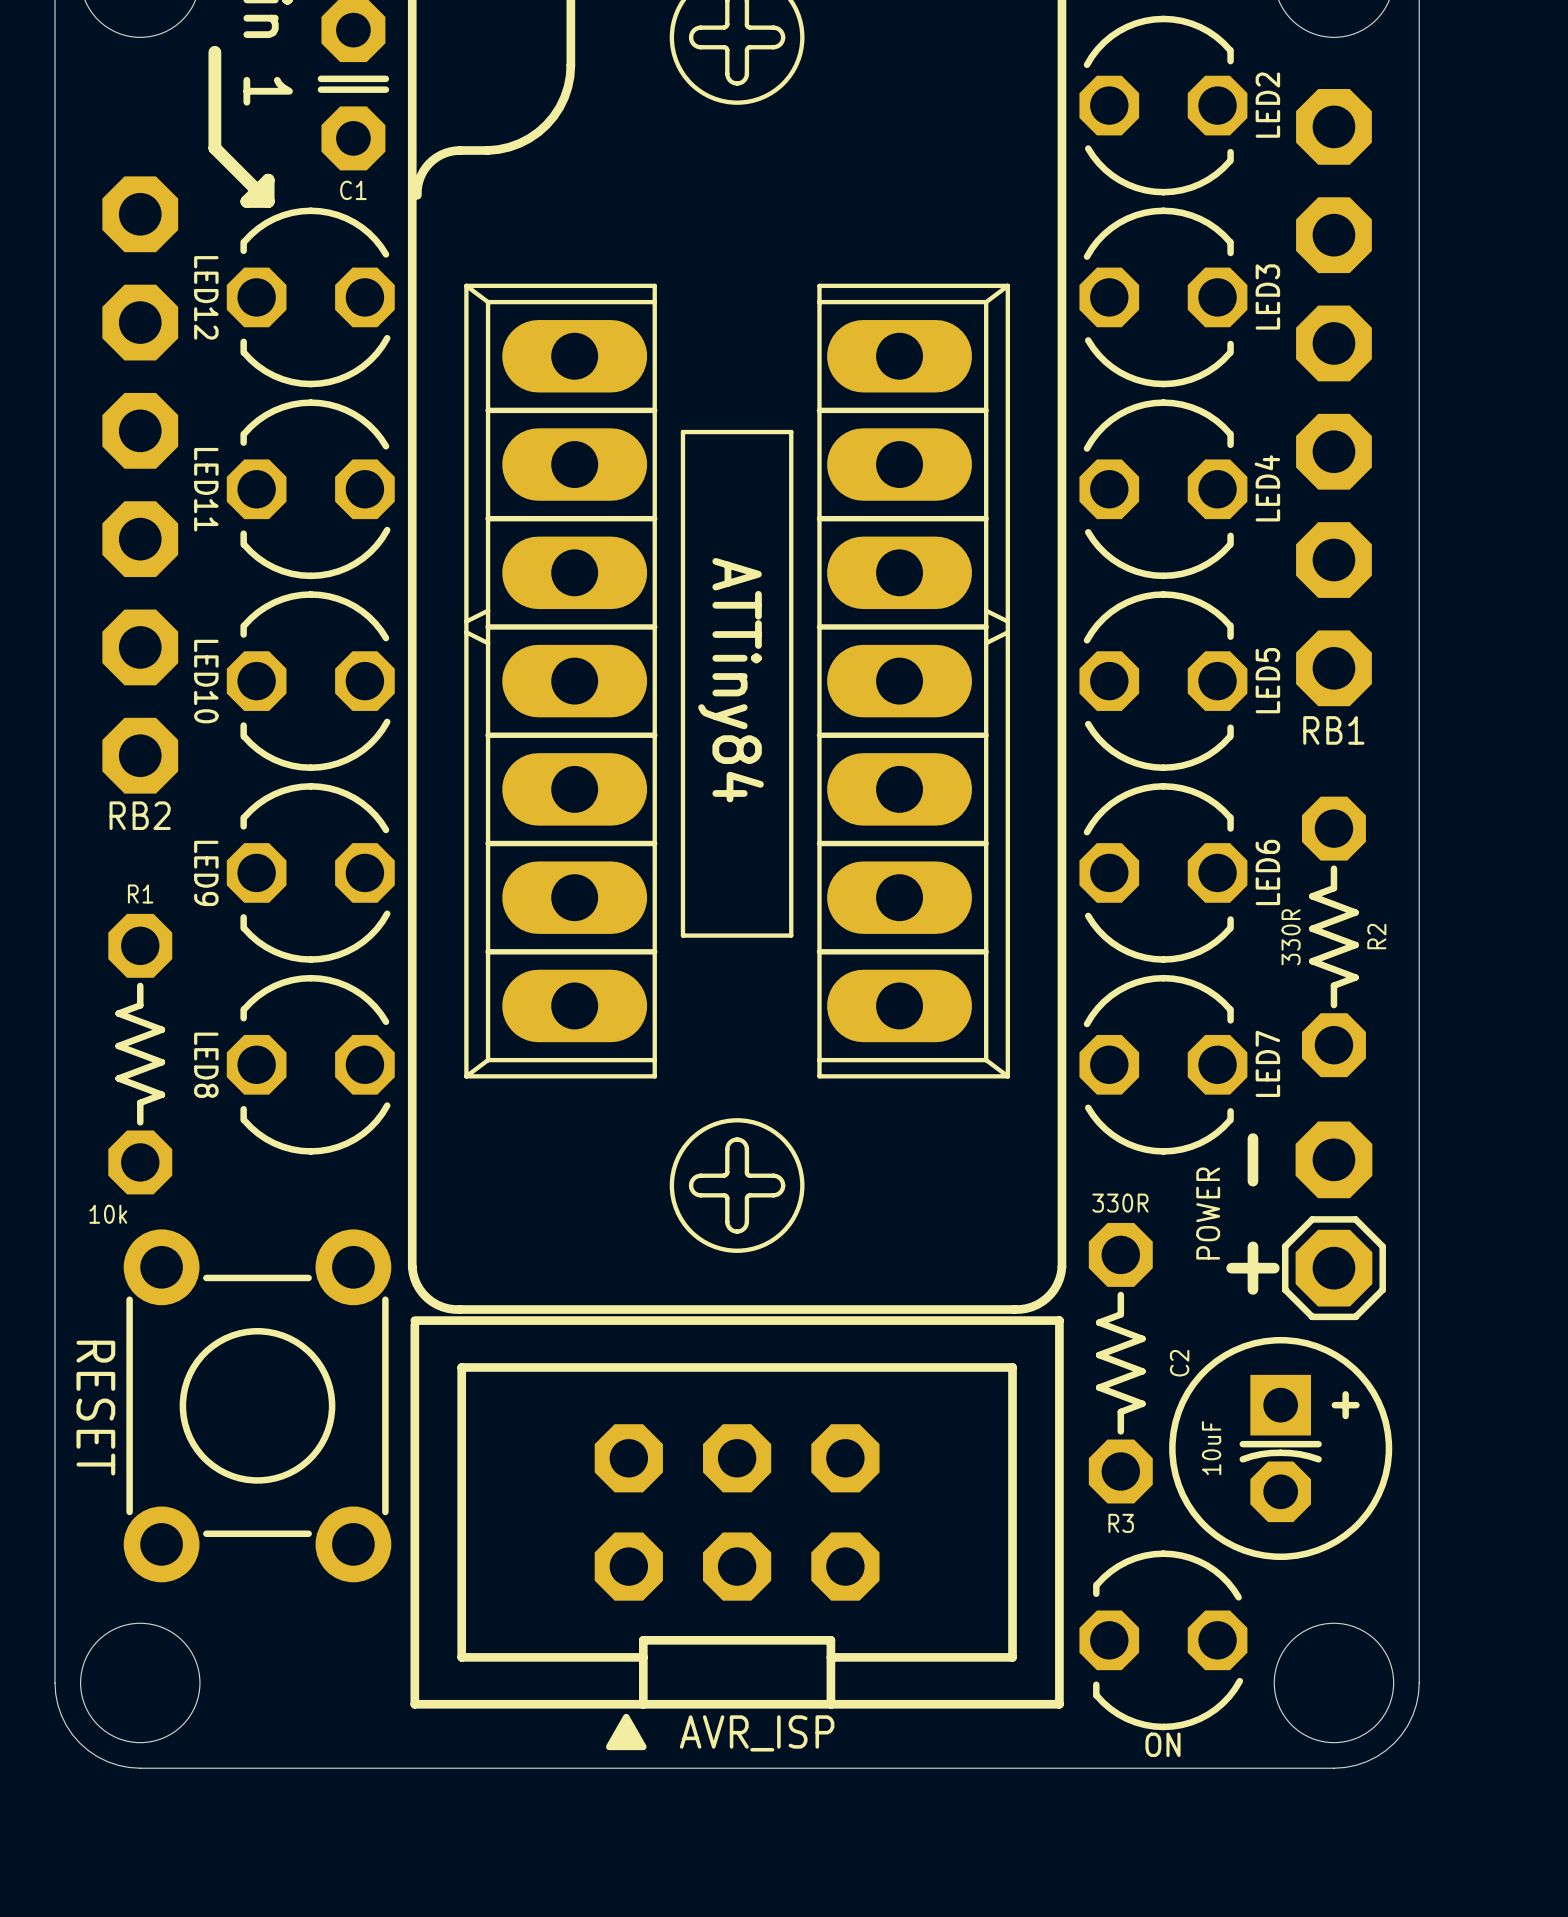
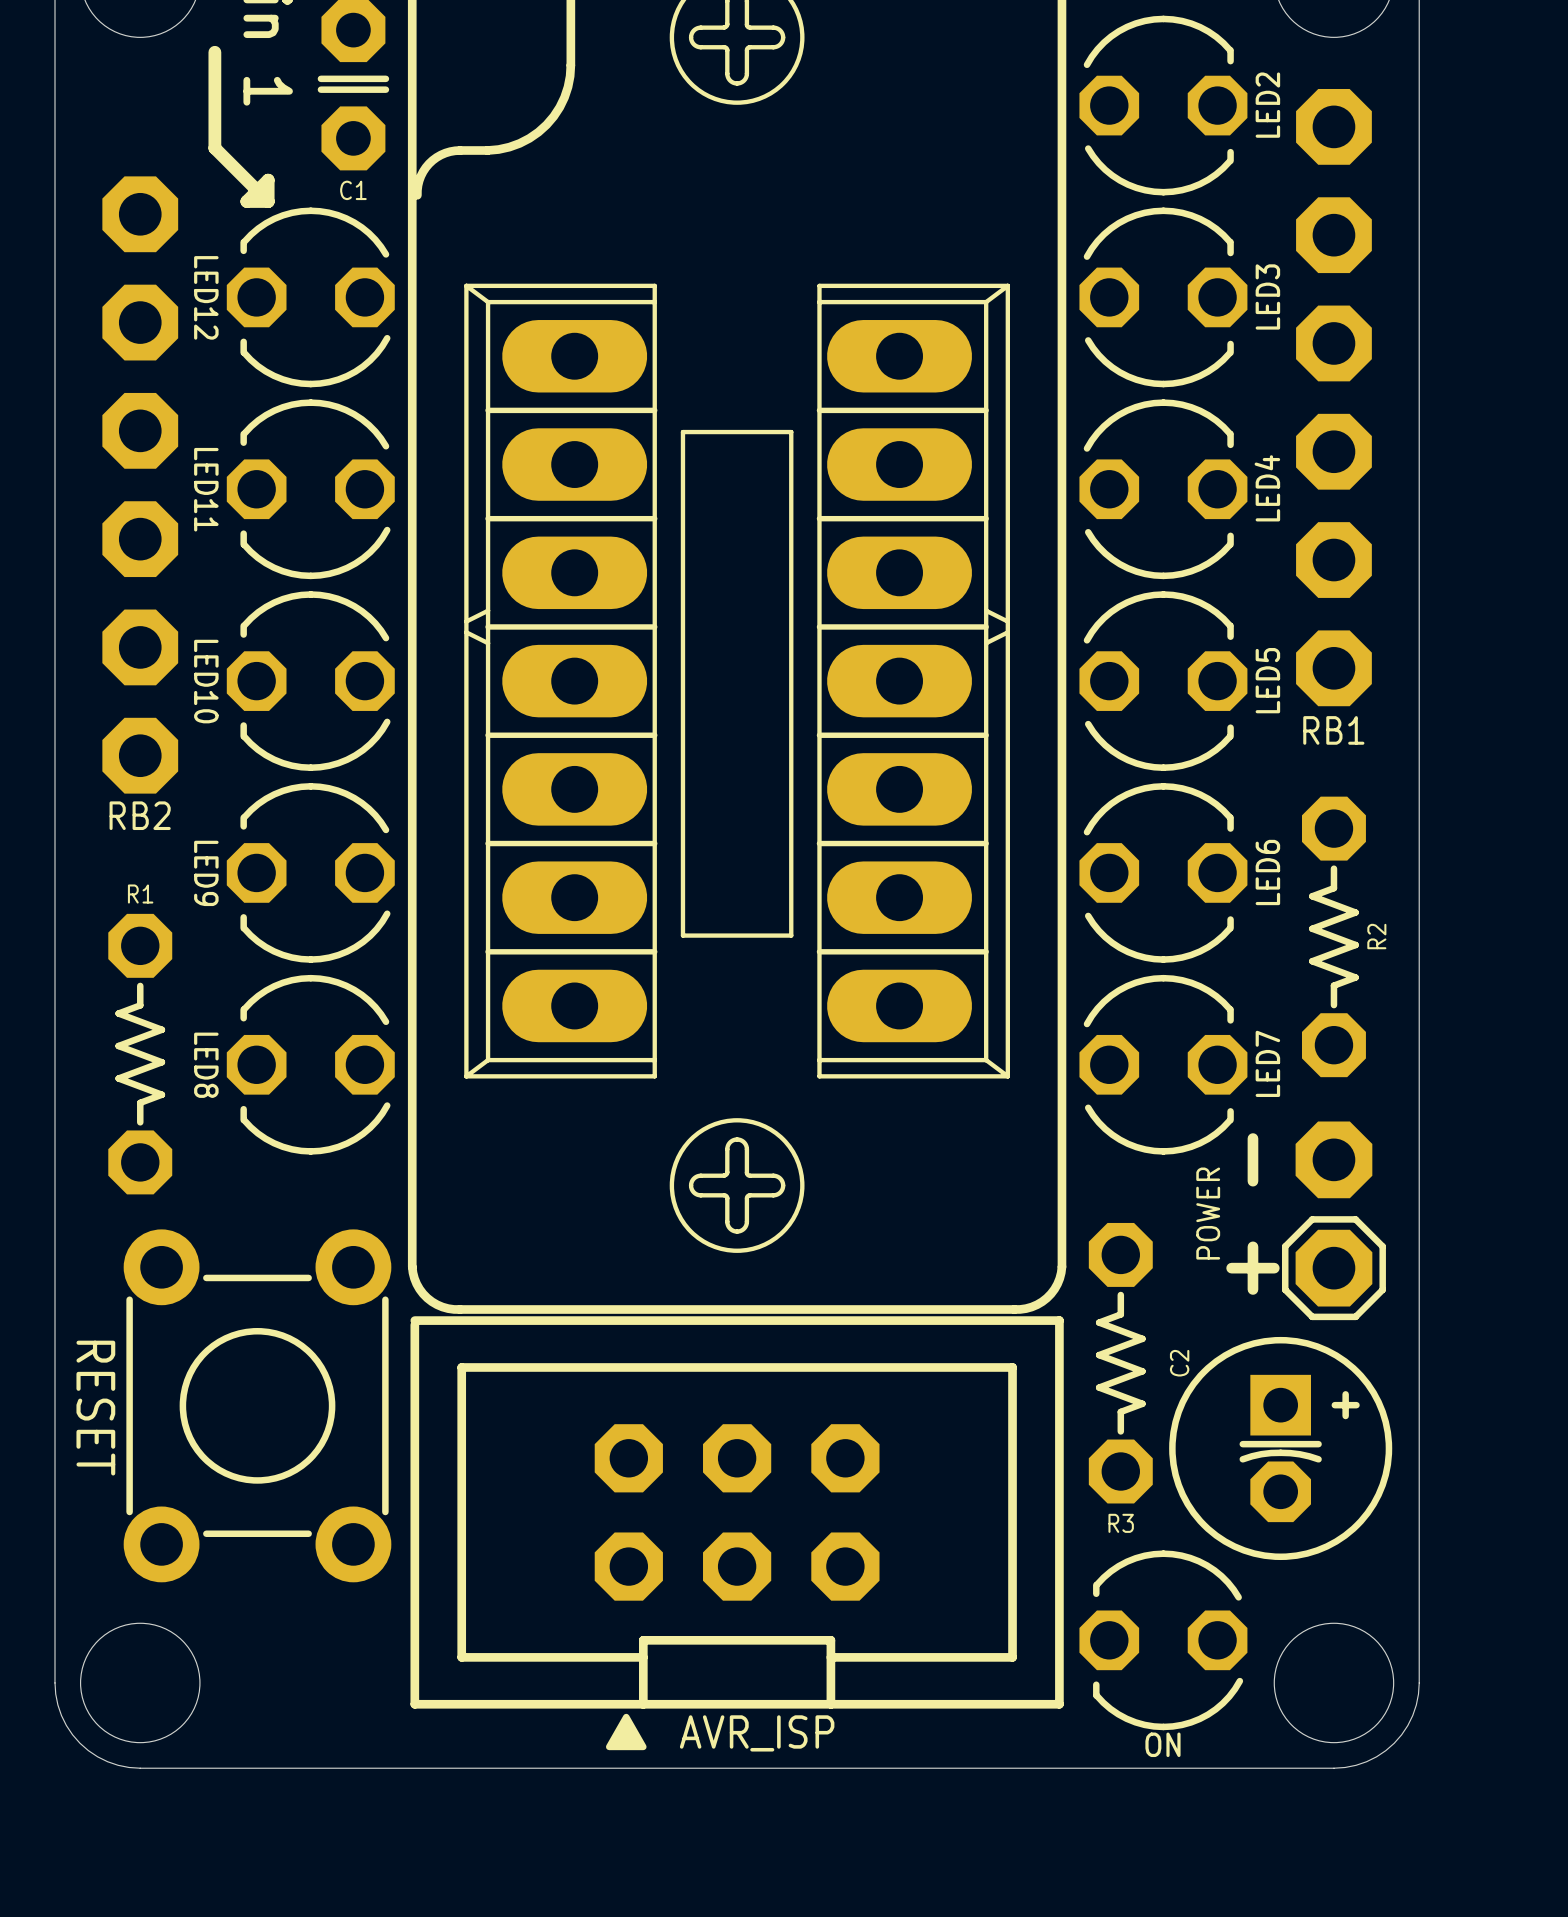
part value: ATTiny84 (731, 680) -> none
R2 value: 330R (1291, 937) -> none
R3 value: 330R (1120, 1203) -> none
R1 value: 10k (108, 1214) -> none
C2 value: 10uF (1211, 1448) -> none

